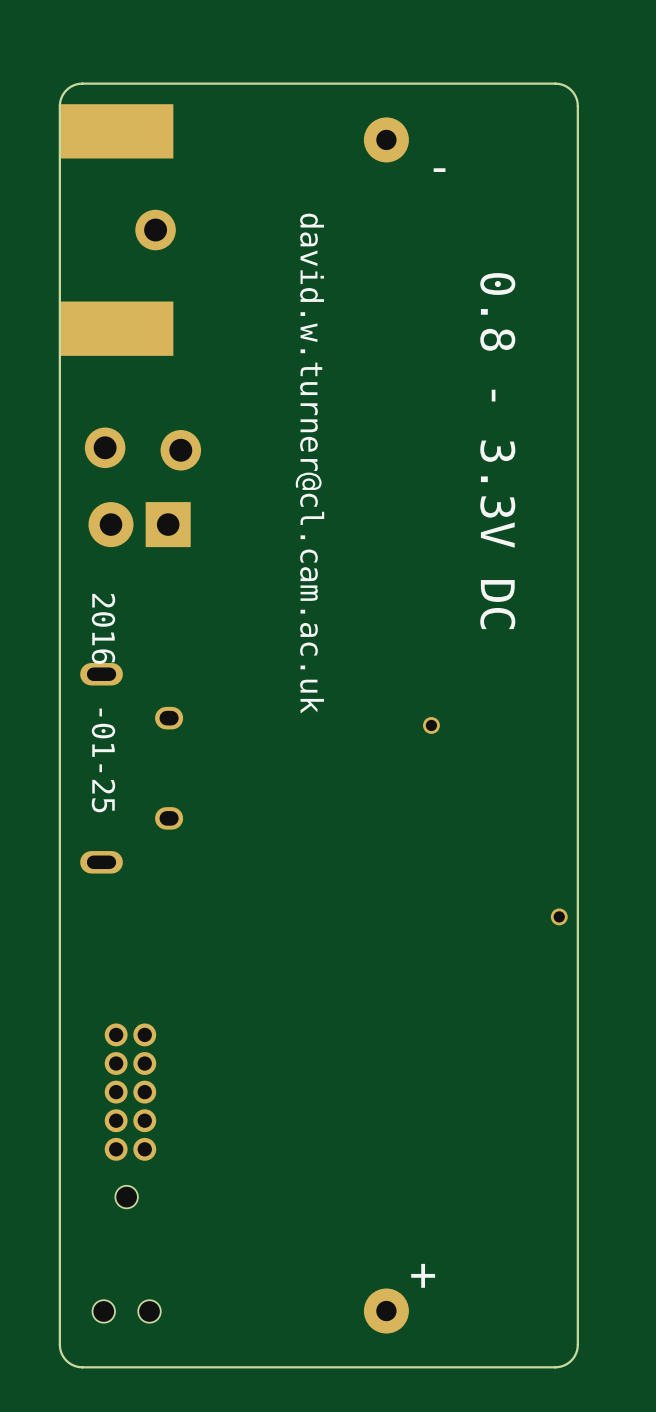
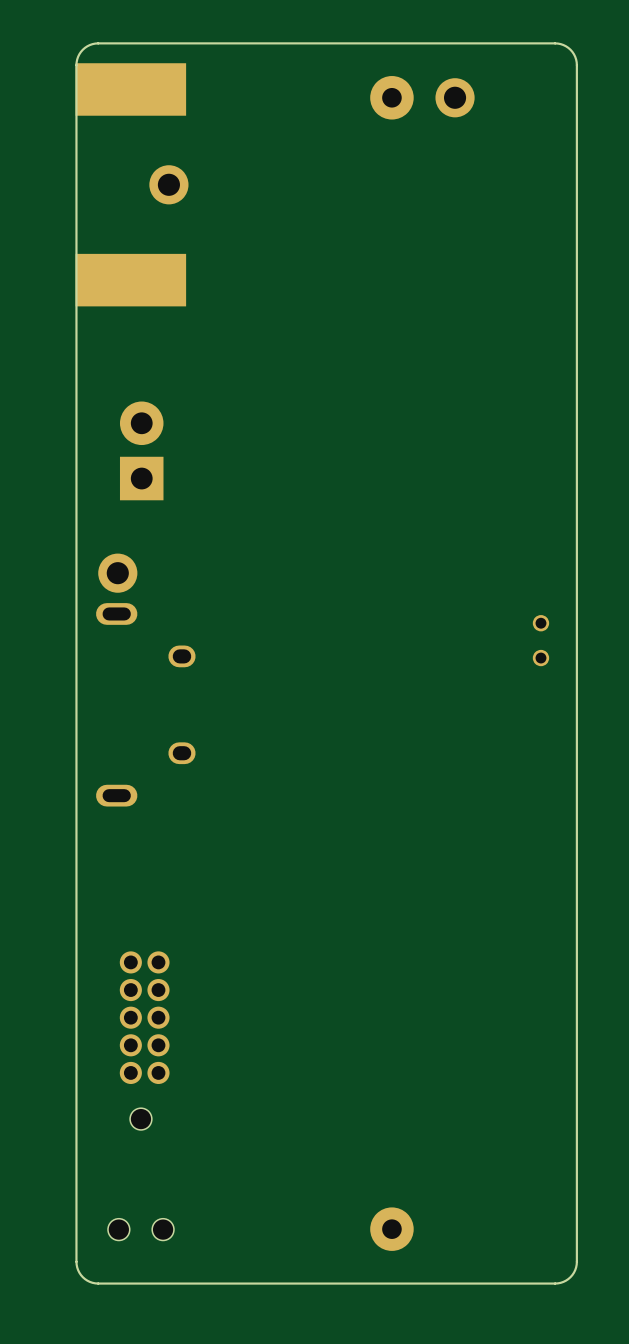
part: none -> (455, 97)
text: - (439, 170) -> none
part: (105, 447) -> none
part: (180, 450) -> none
text: 0.8 - 3.3V DC (497, 451) -> none
text: david.w.turner@cl.cam.ac.uk (309, 463) -> none
part rotation: 0° (139, 524) -> 90° clockwise (141, 450)
part: none -> (117, 573)
part: none -> (540, 623)
text: 2016 -01-25 (103, 703) -> none
part: none -> (540, 658)
part: (431, 725) -> none
part: (559, 916) -> none
text: + (423, 1275) -> none

